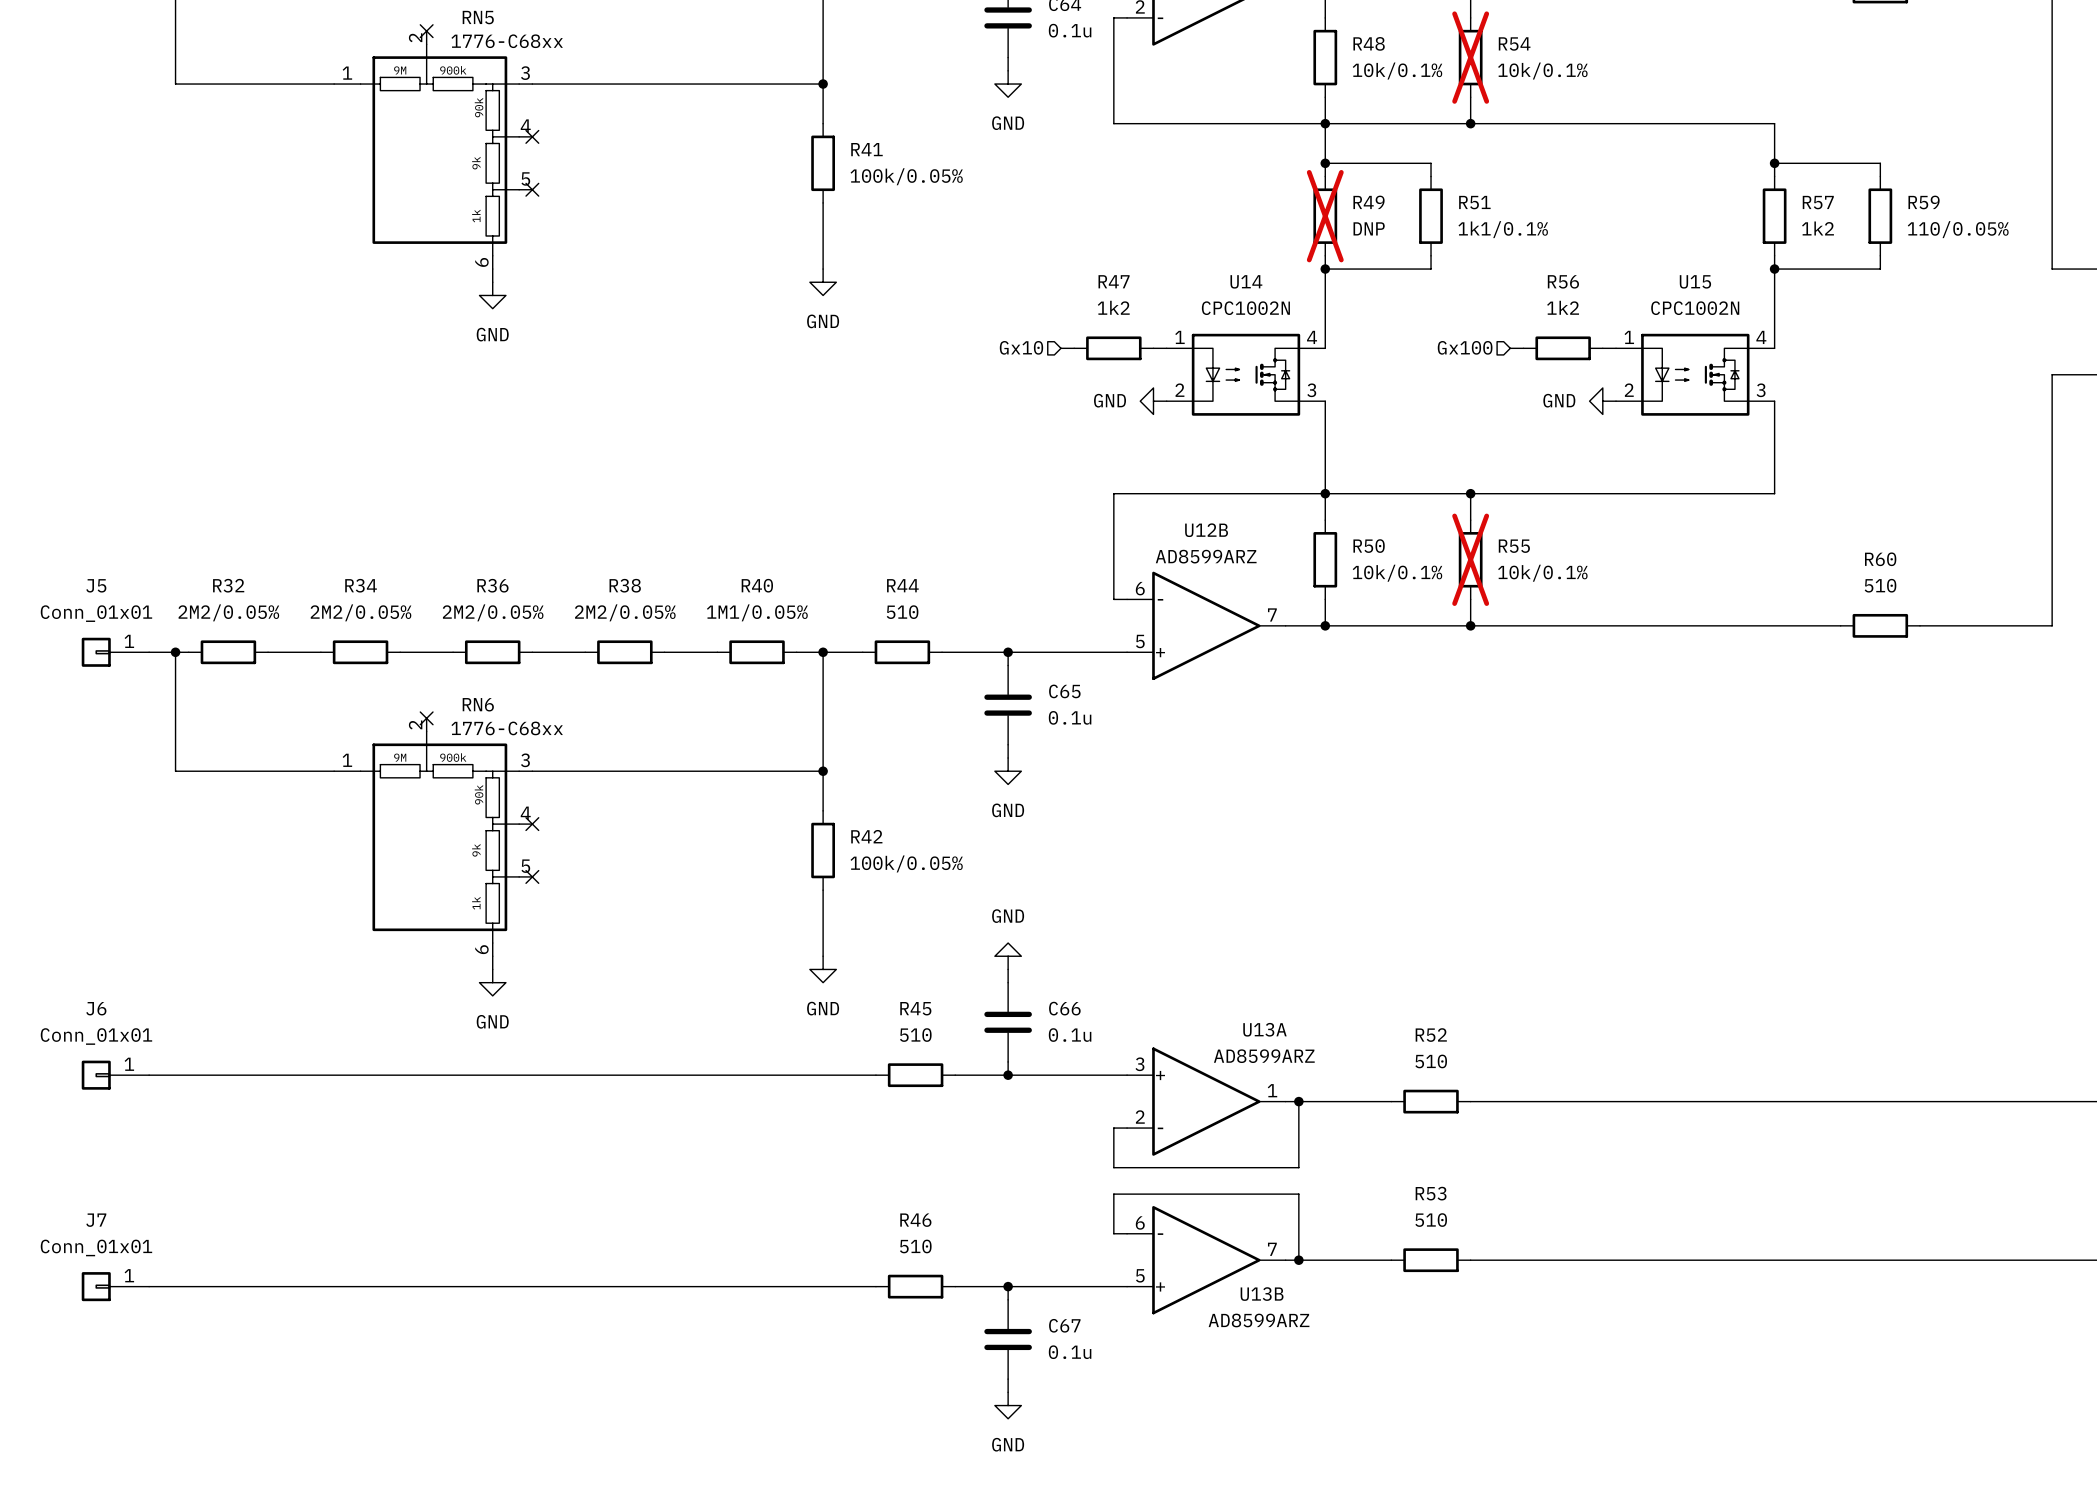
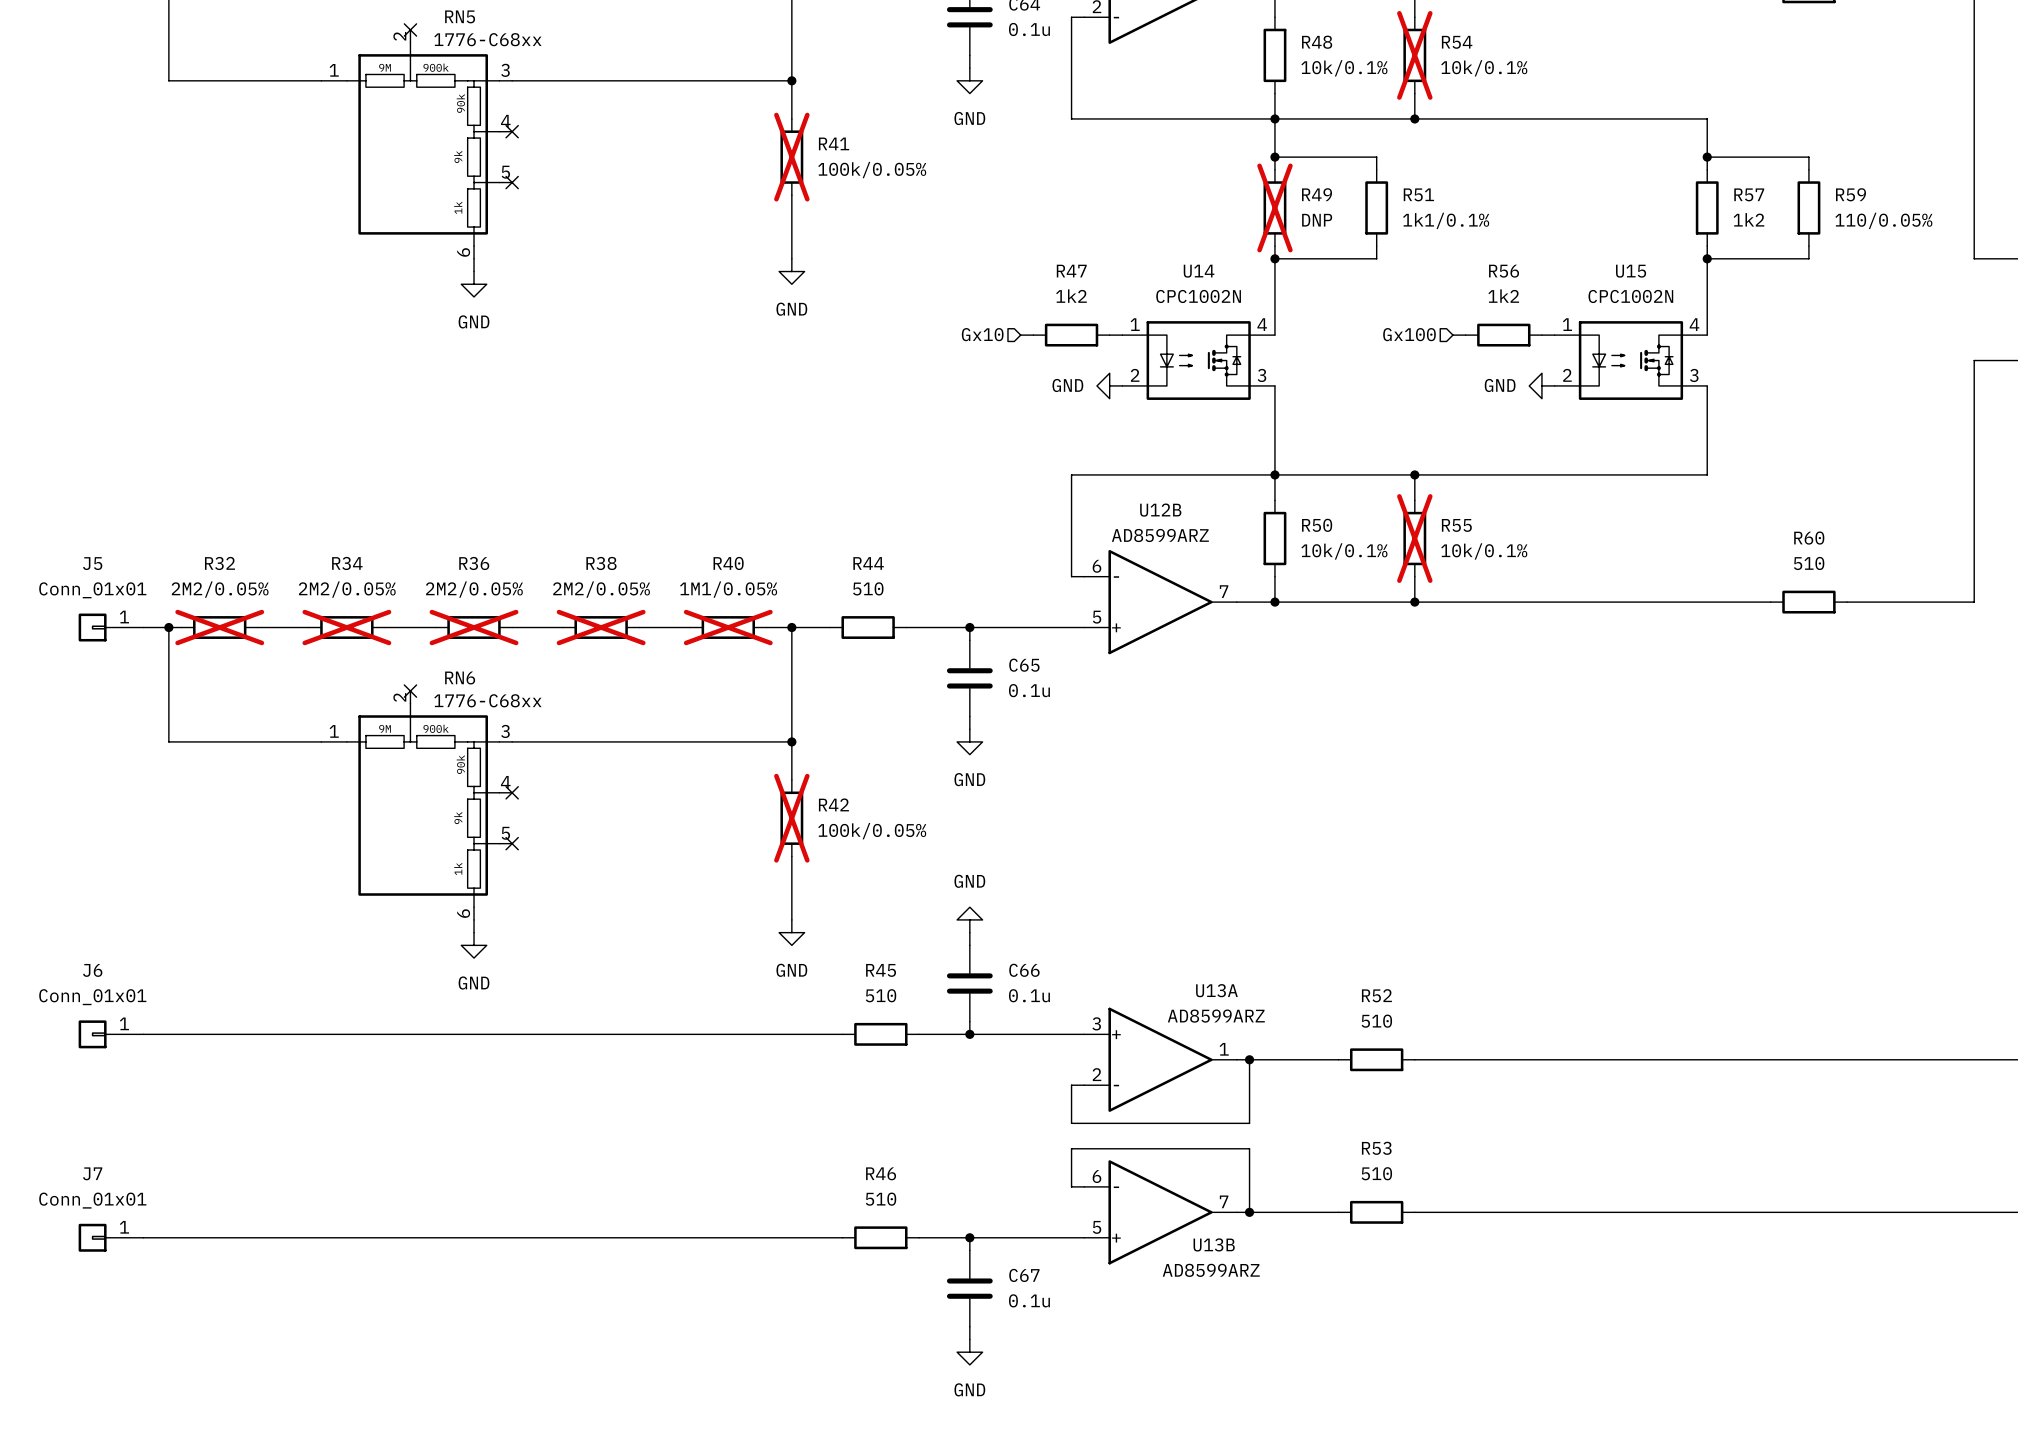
R41 do-not-place cross: none -> (791, 157)
R32 do-not-place cross: none -> (219, 627)
R34 do-not-place cross: none -> (346, 627)
R36 do-not-place cross: none -> (474, 627)
R38 do-not-place cross: none -> (601, 627)
R40 do-not-place cross: none -> (728, 627)
R42 do-not-place cross: none -> (791, 818)

